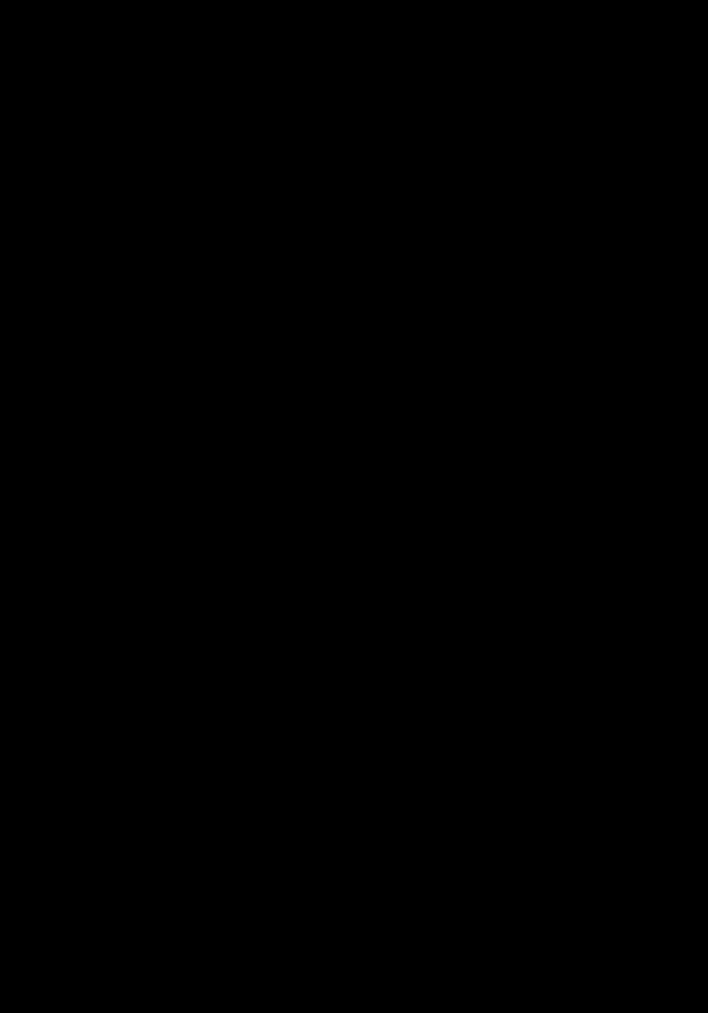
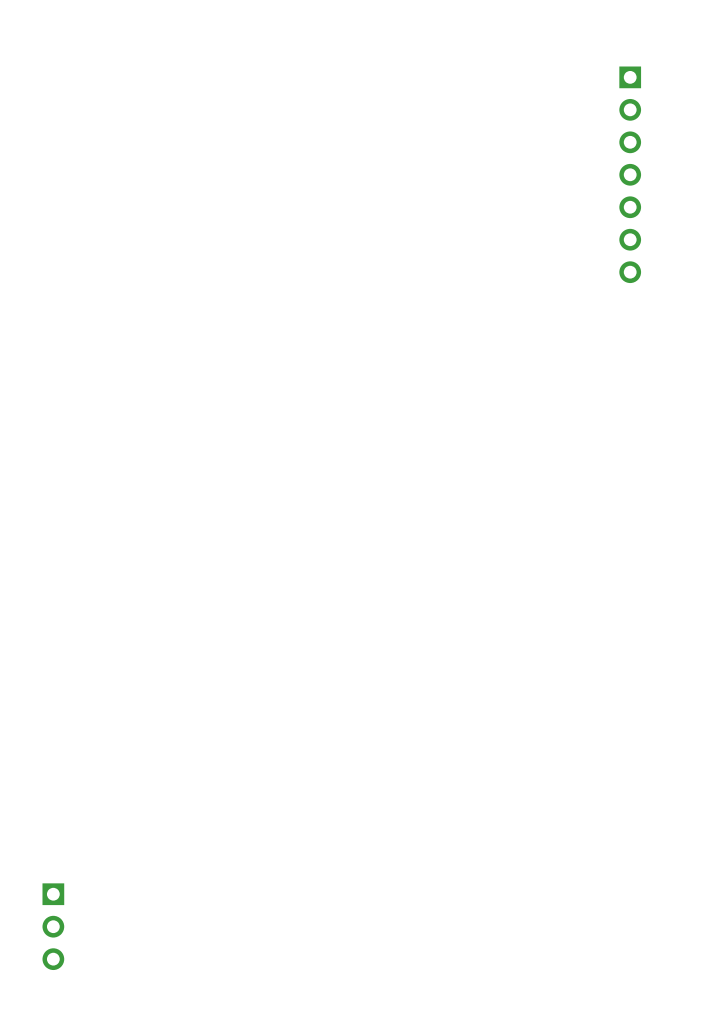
part: none -> (630, 174)
part: none -> (53, 926)

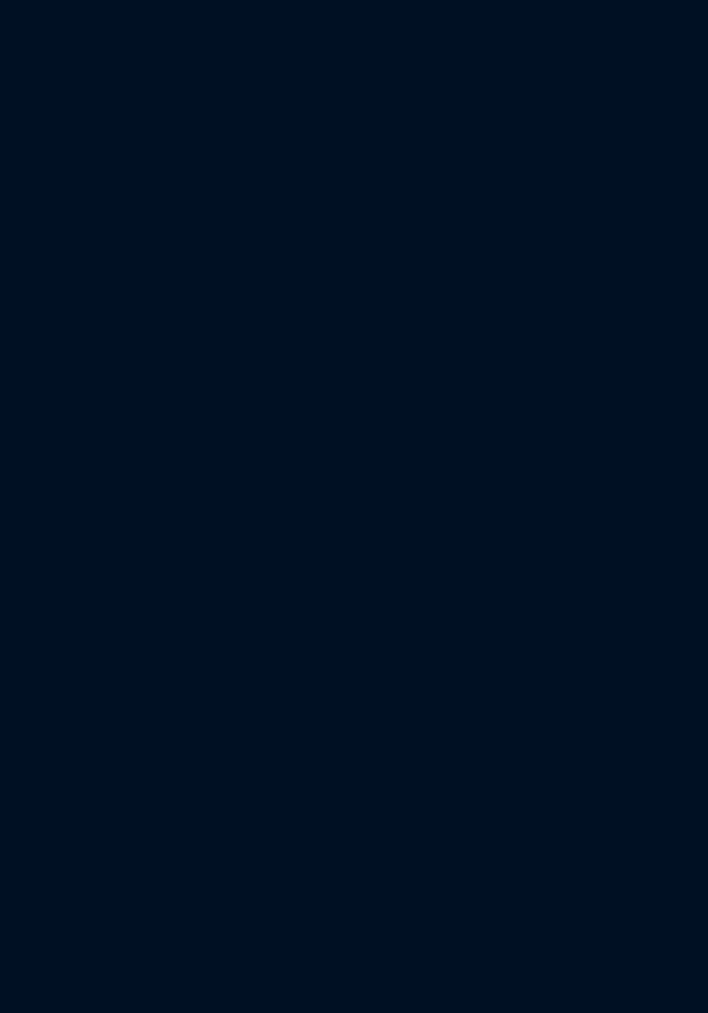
part: (630, 174) -> none
part: (53, 926) -> none

